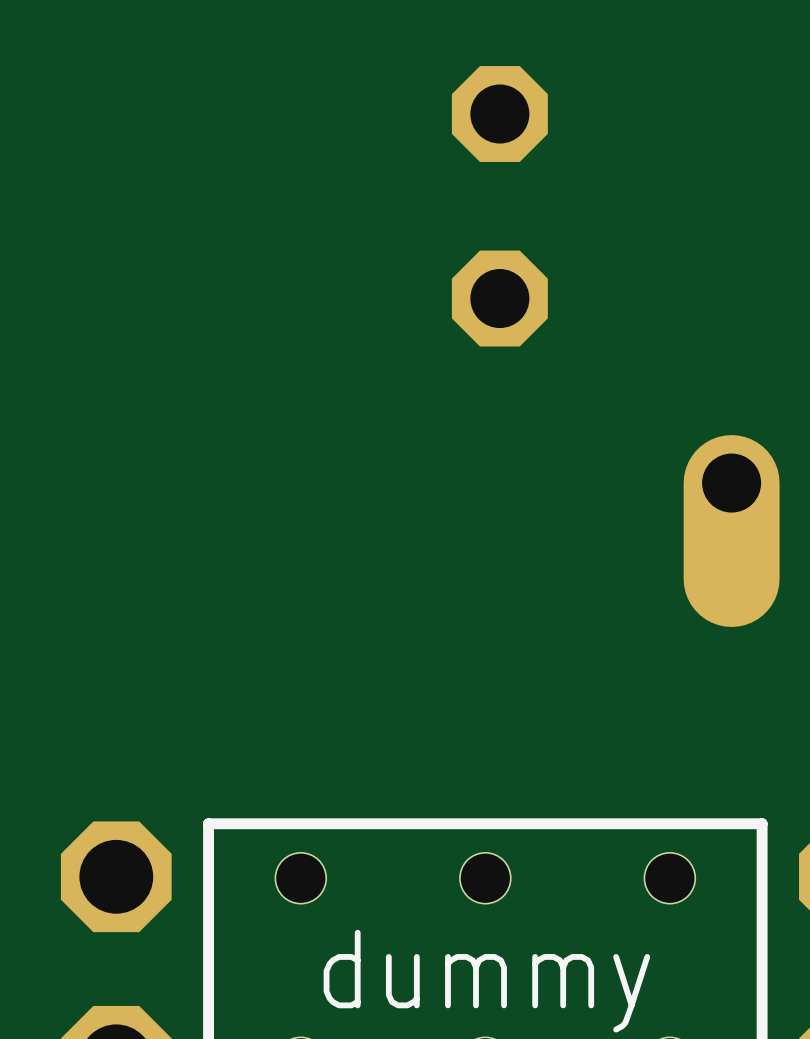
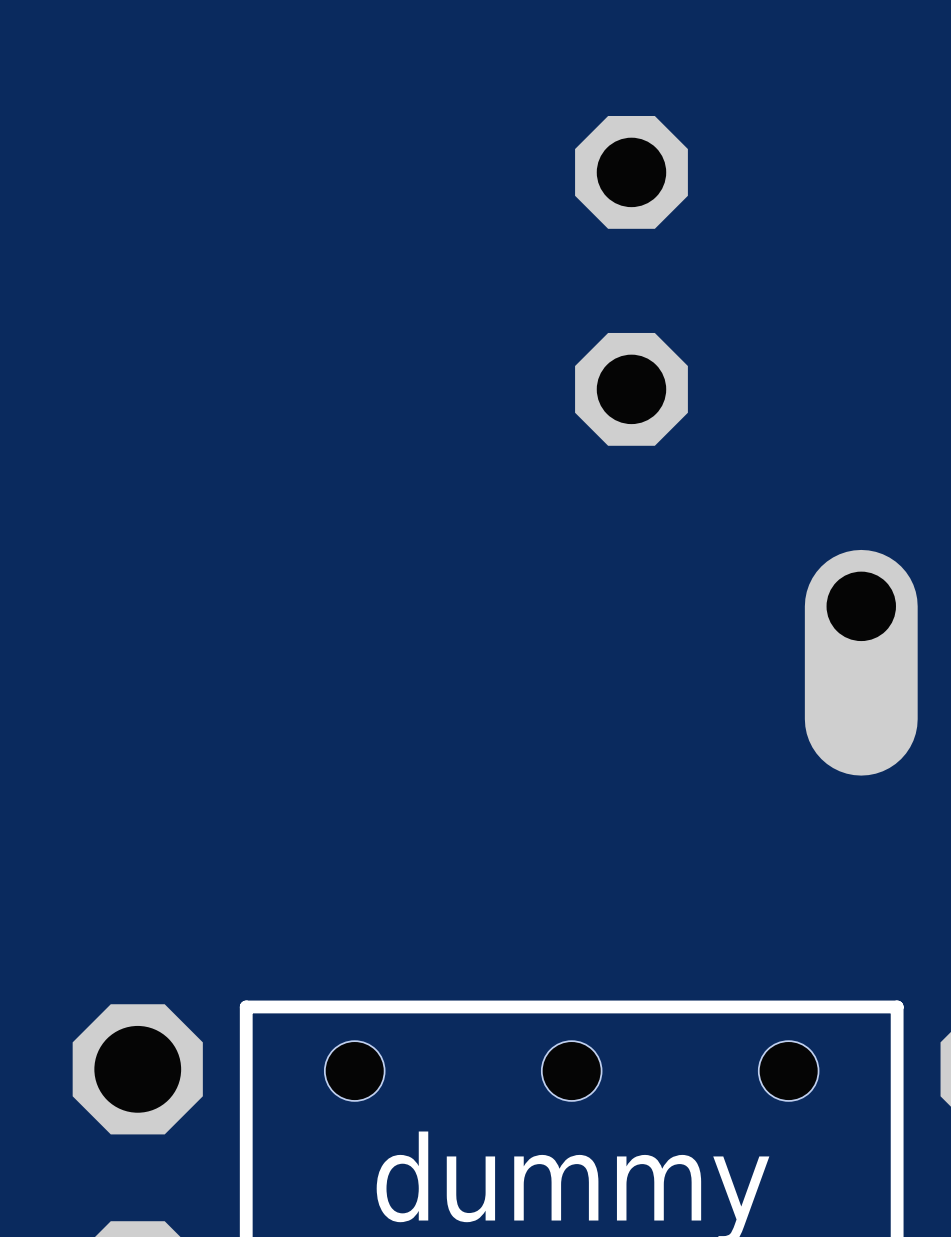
part position: (499, 206) -> (631, 280)

